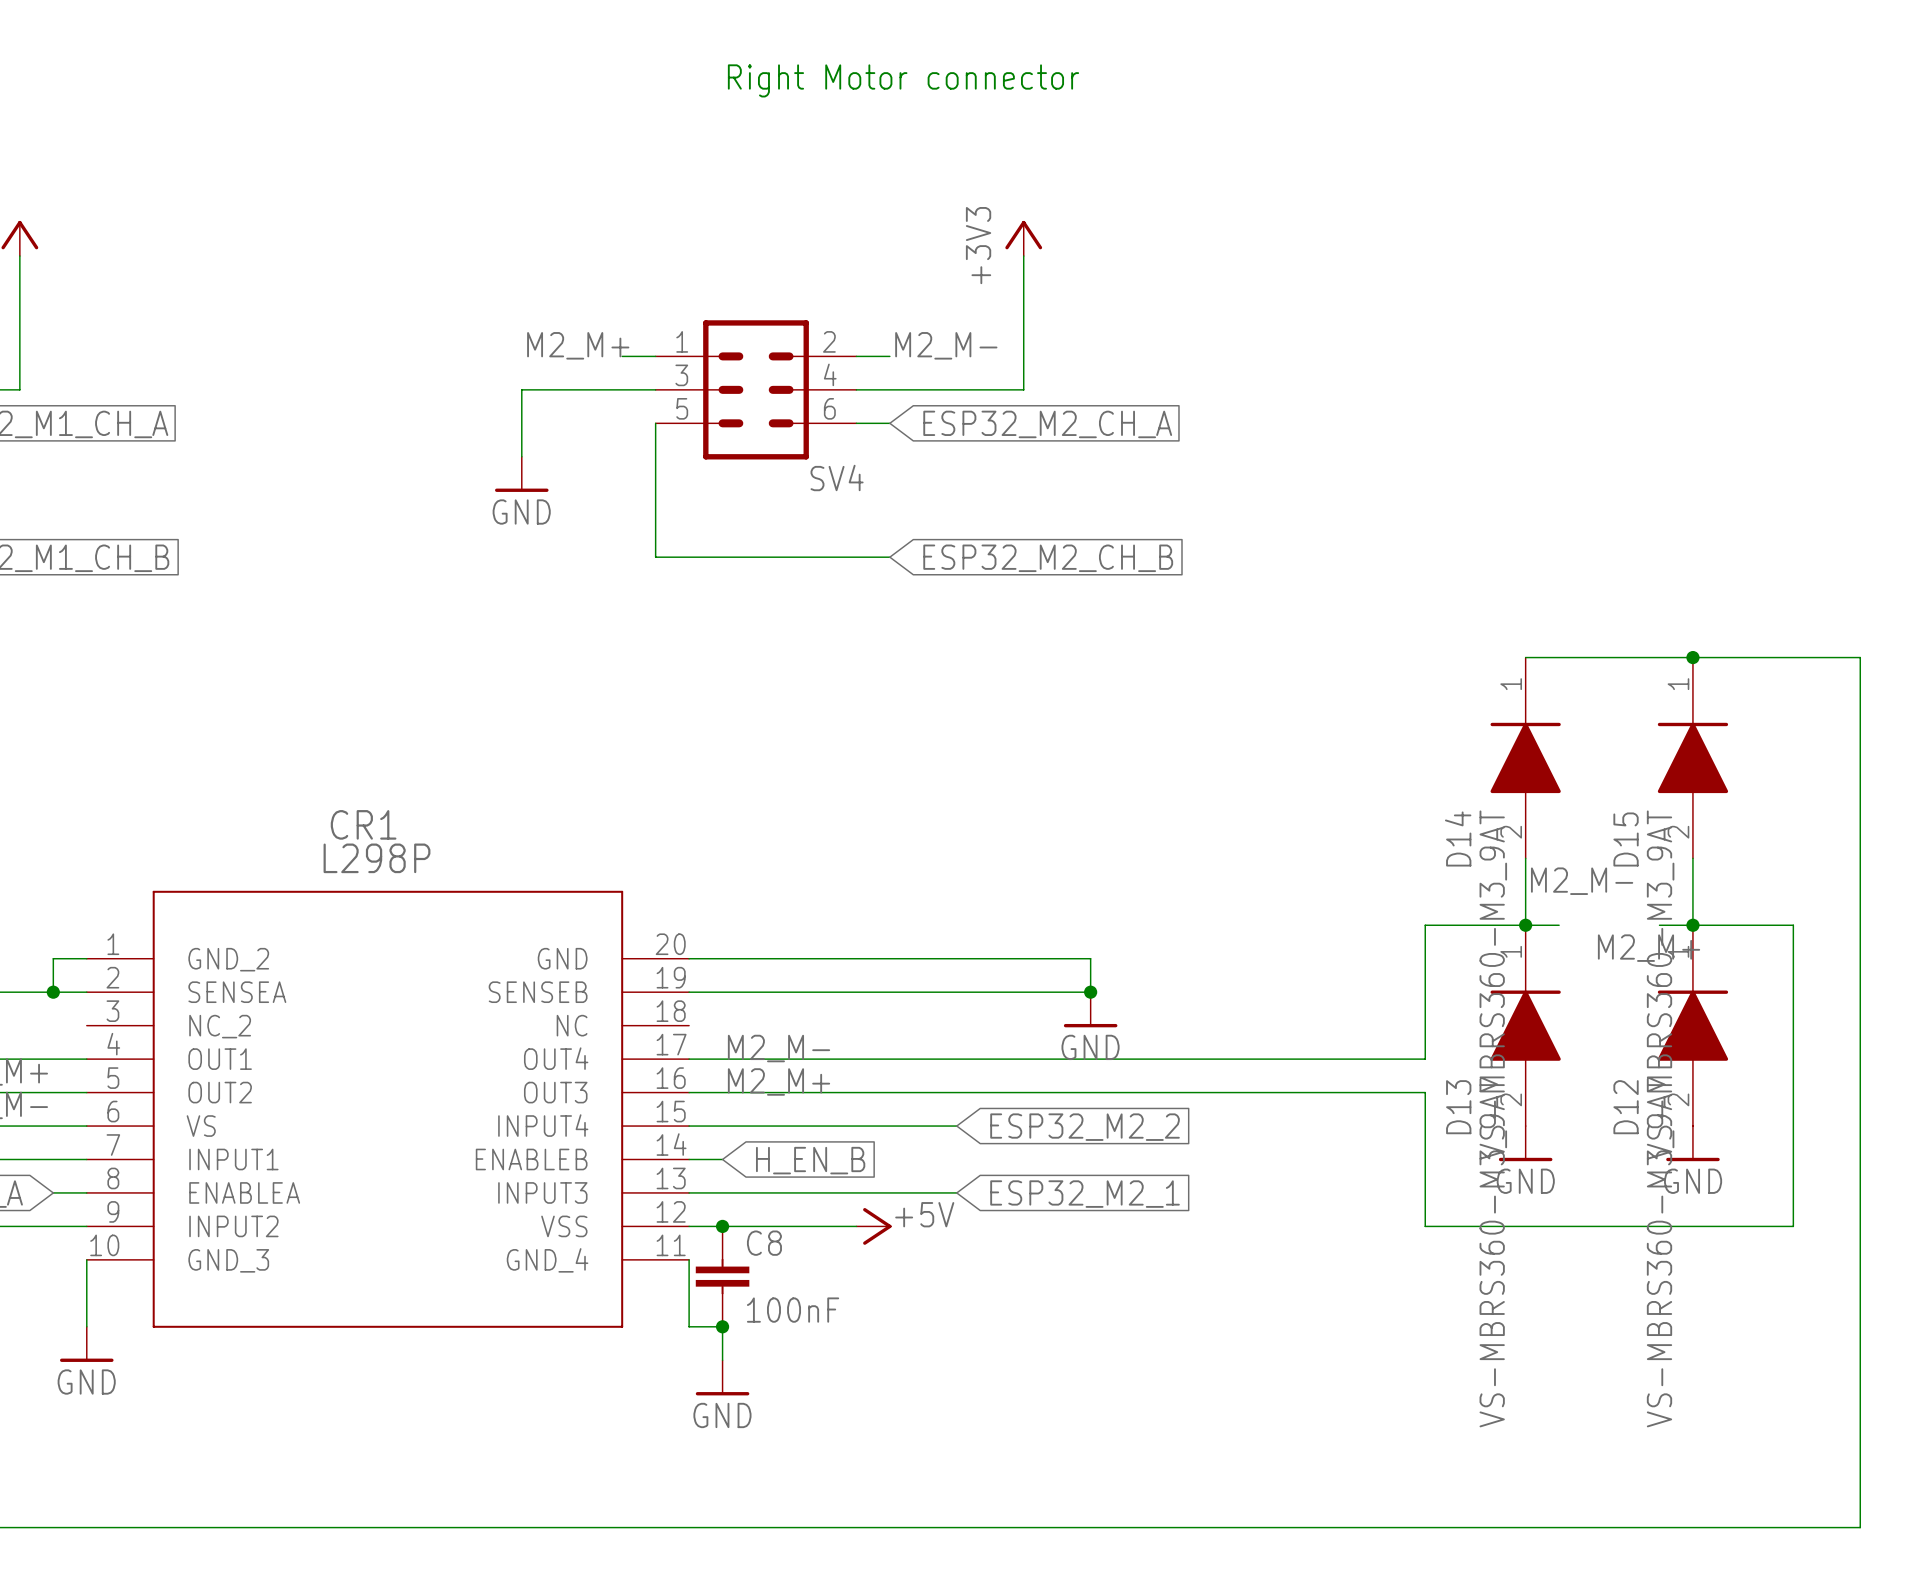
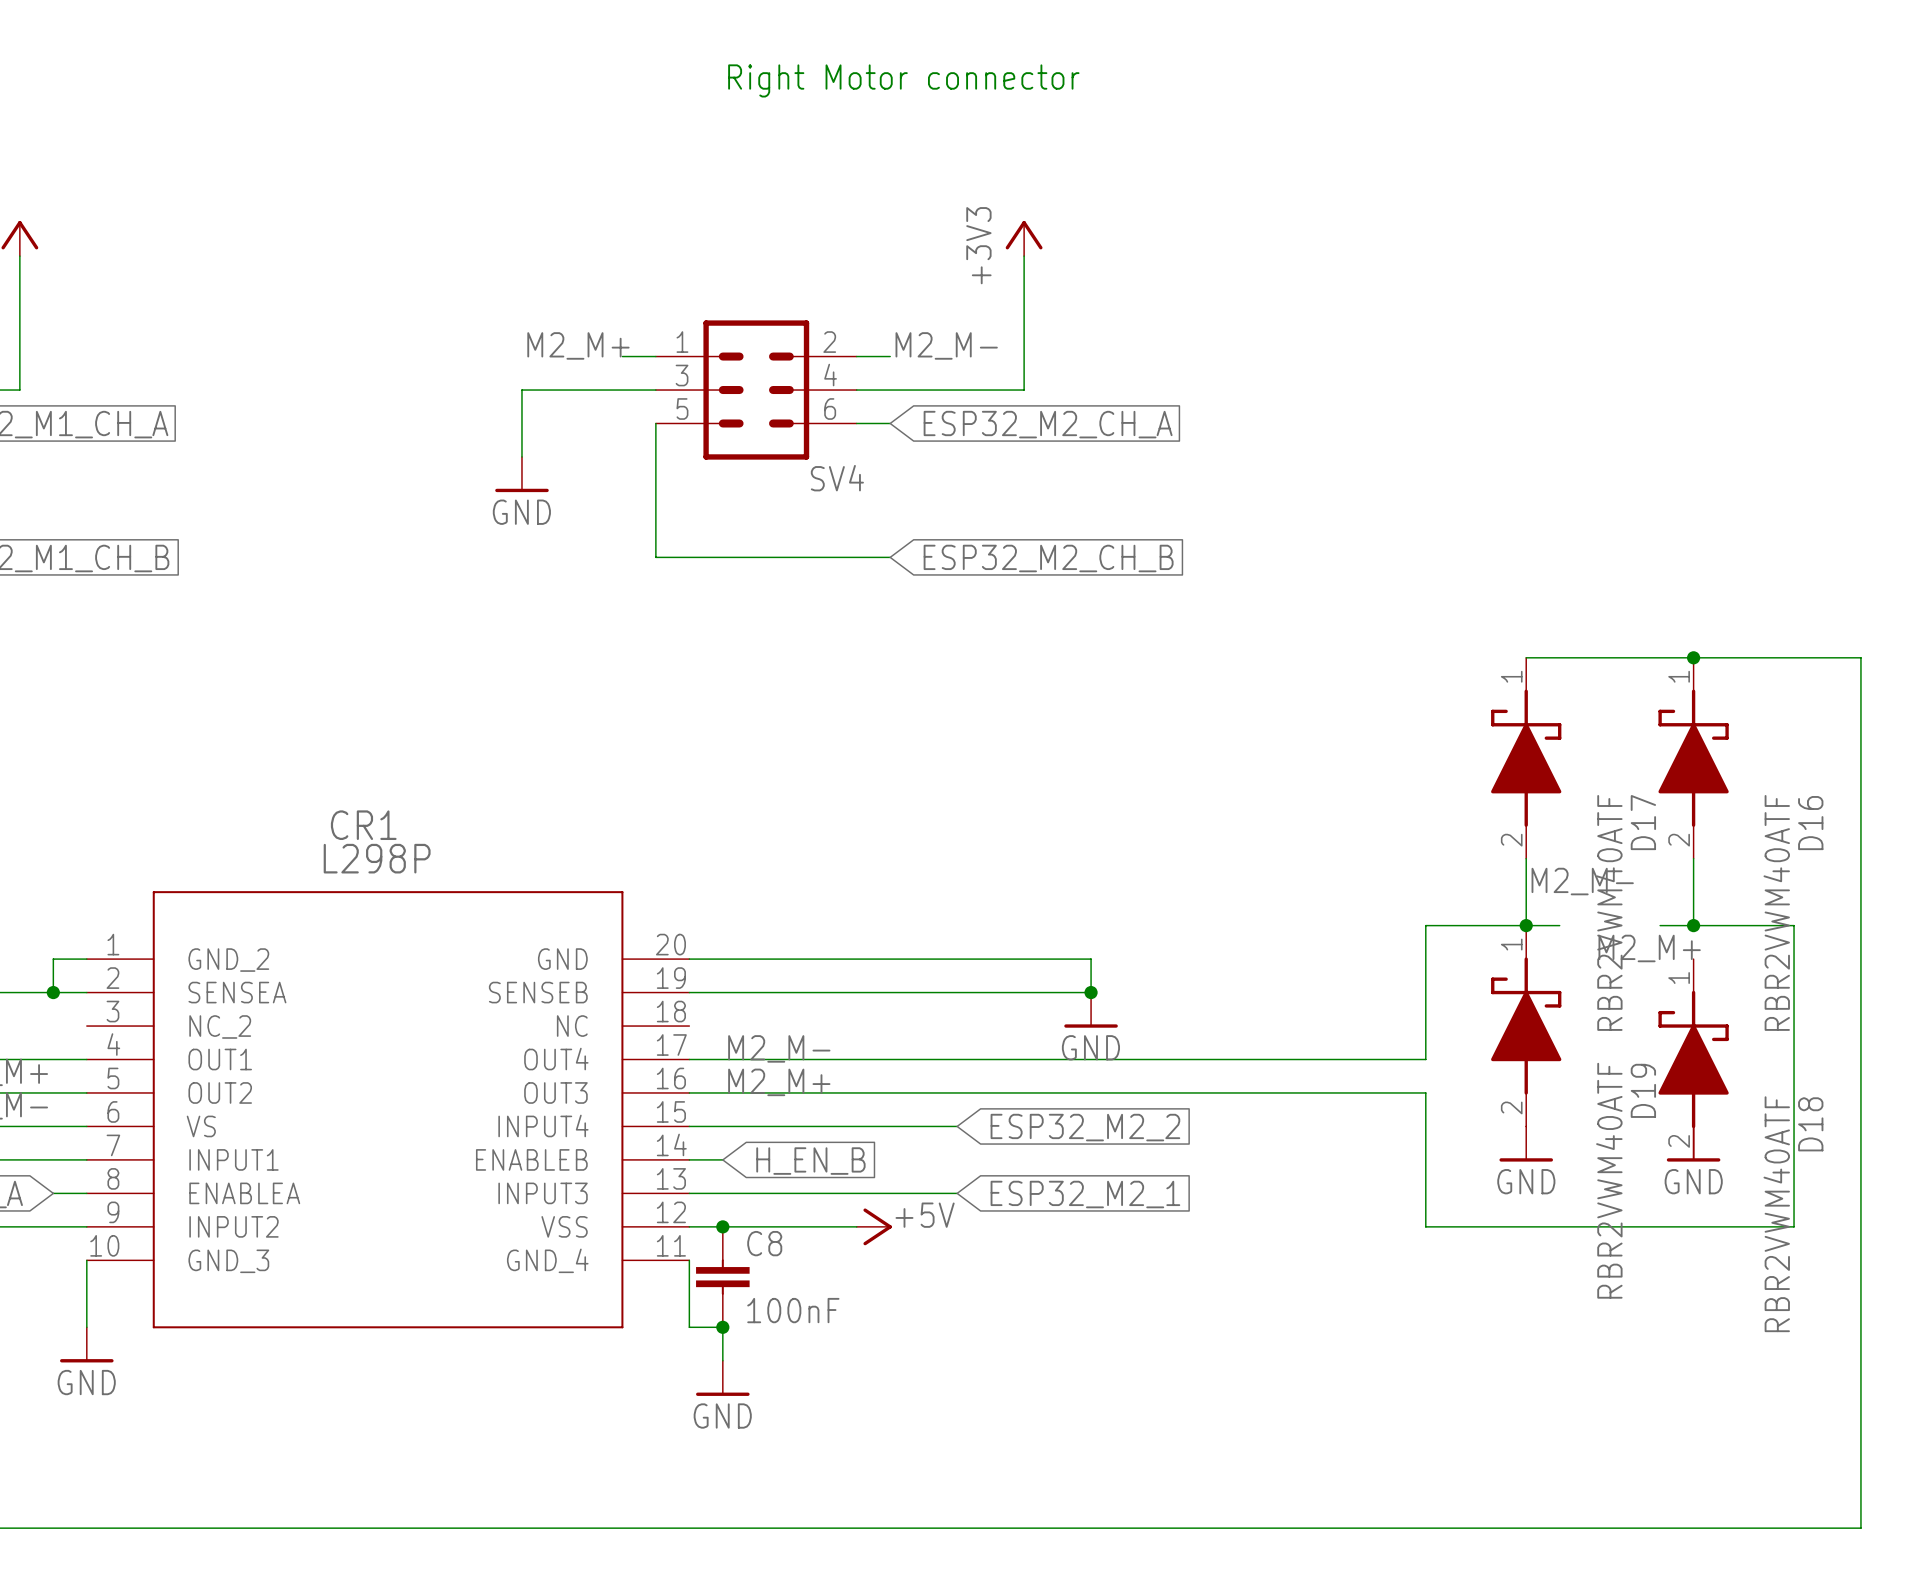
D14: VS-MBRS360-M3_9AT (1525, 757) -> none
D17: none -> RBR2VWM40ATF (1526, 758)
D15: VS-MBRS360-M3_9AT (1692, 757) -> none
D16: none -> RBR2VWM40ATF (1693, 758)
D13: VS-MBRS360-M3_9AT (1525, 1025) -> none
D19: none -> RBR2VWM40ATF (1526, 1026)
D12: VS-MBRS360-M3_9AT (1692, 1025) -> none
D18: none -> RBR2VWM40ATF (1693, 1059)

